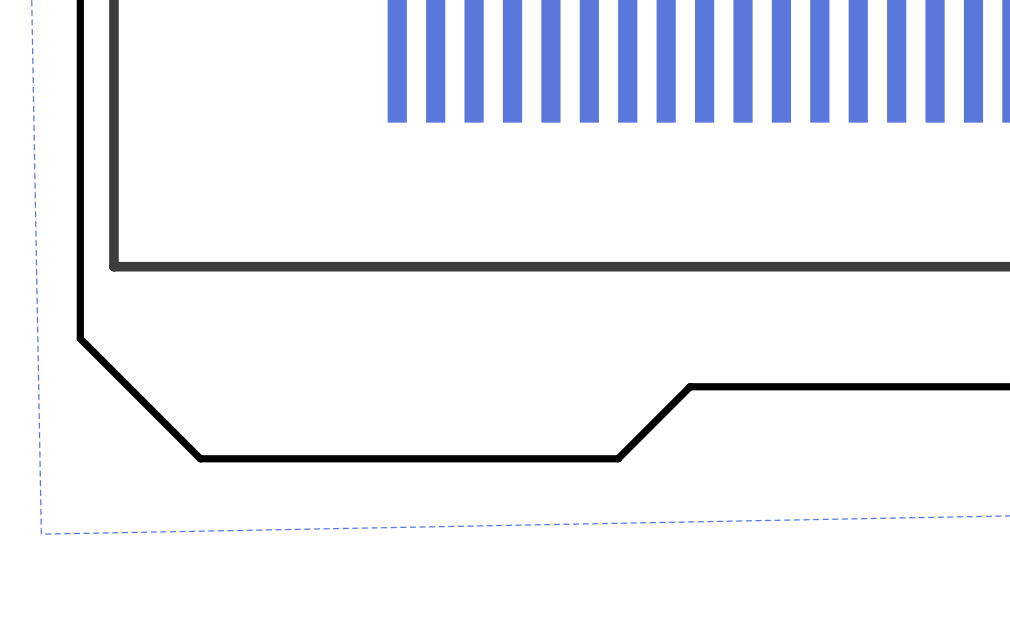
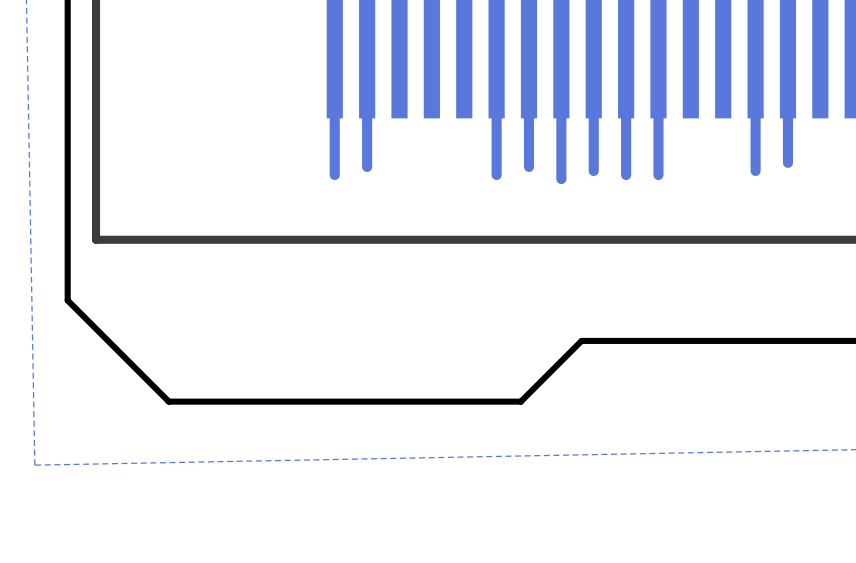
bottom track: none -> (334, 57) (334, 175)
bottom track: none -> (367, 57) (367, 166)
bottom track: none -> (496, 57) (496, 175)
bottom track: none -> (528, 57) (528, 166)
bottom track: none -> (561, 57) (561, 179)
bottom track: none -> (593, 57) (593, 170)
bottom track: none -> (626, 57) (626, 175)
bottom track: none -> (658, 57) (658, 175)
bottom track: none -> (755, 57) (755, 170)
bottom track: none -> (787, 57) (787, 162)

